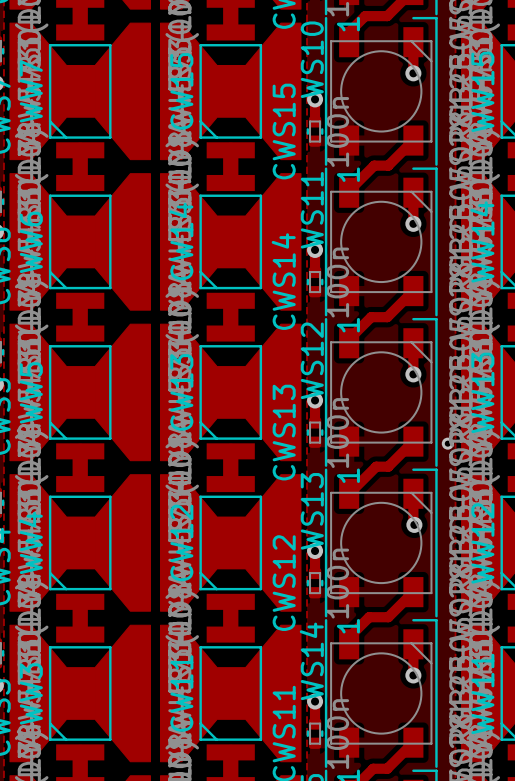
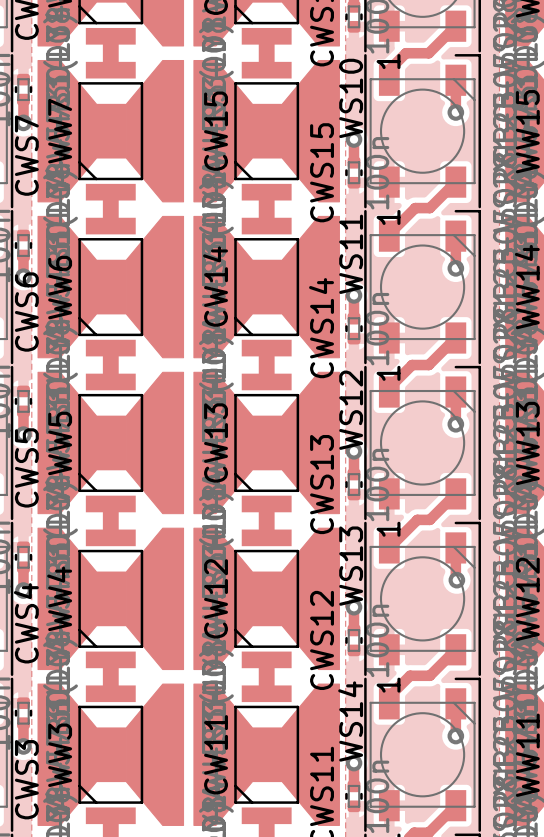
via: (447, 443) -> none

